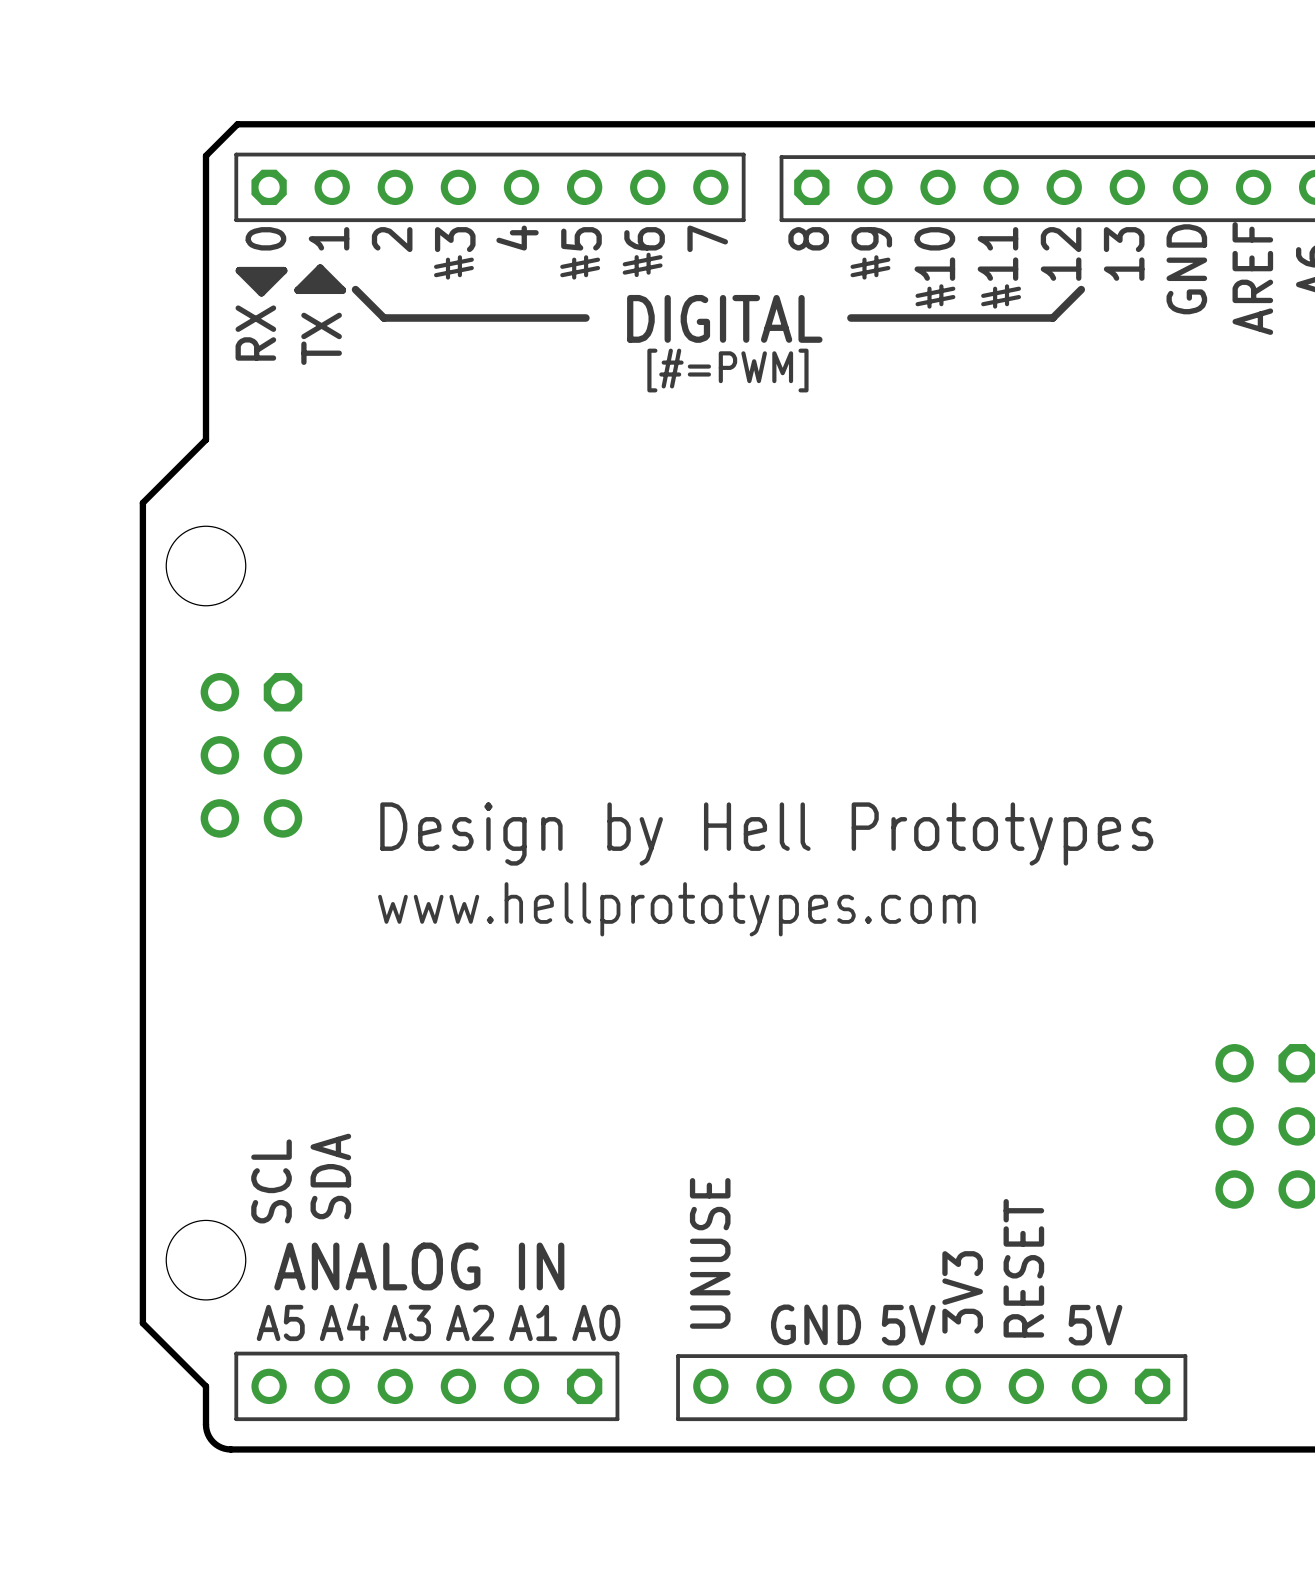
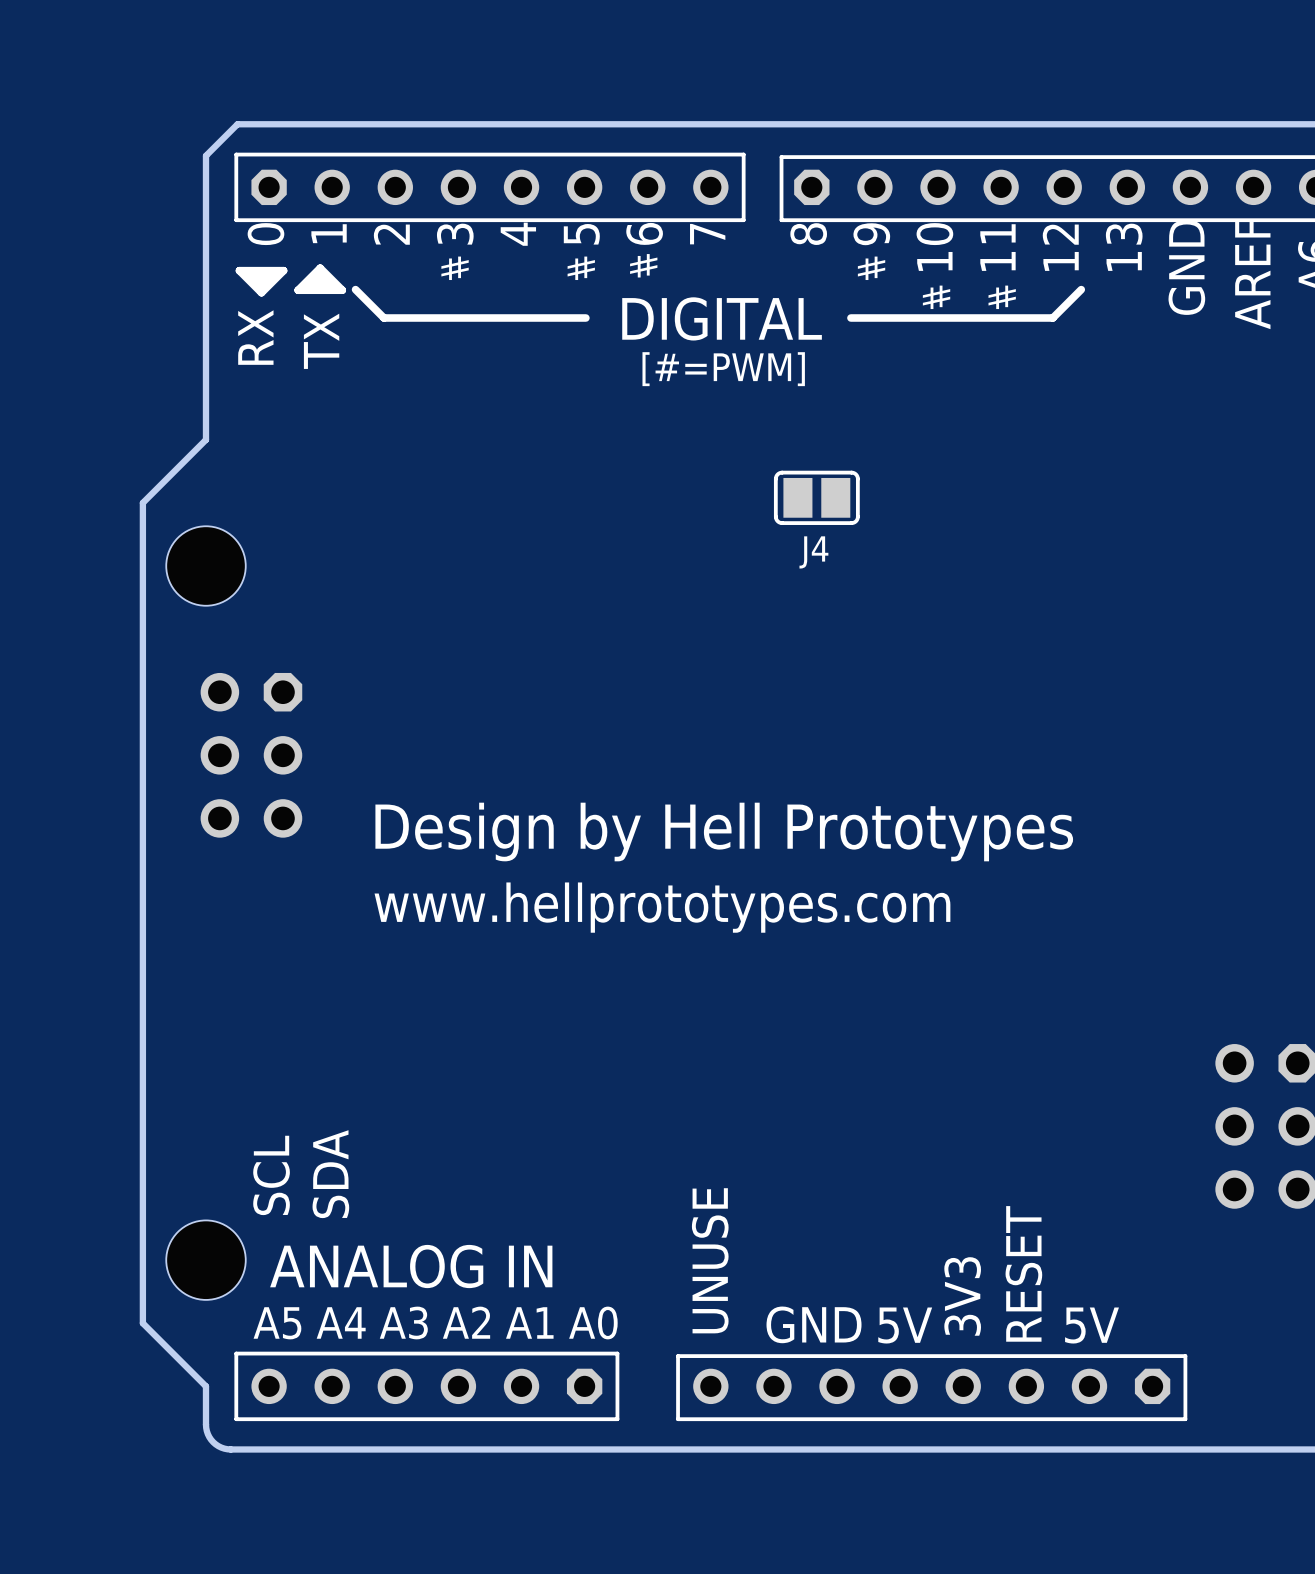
J4: none -> (816, 497)

